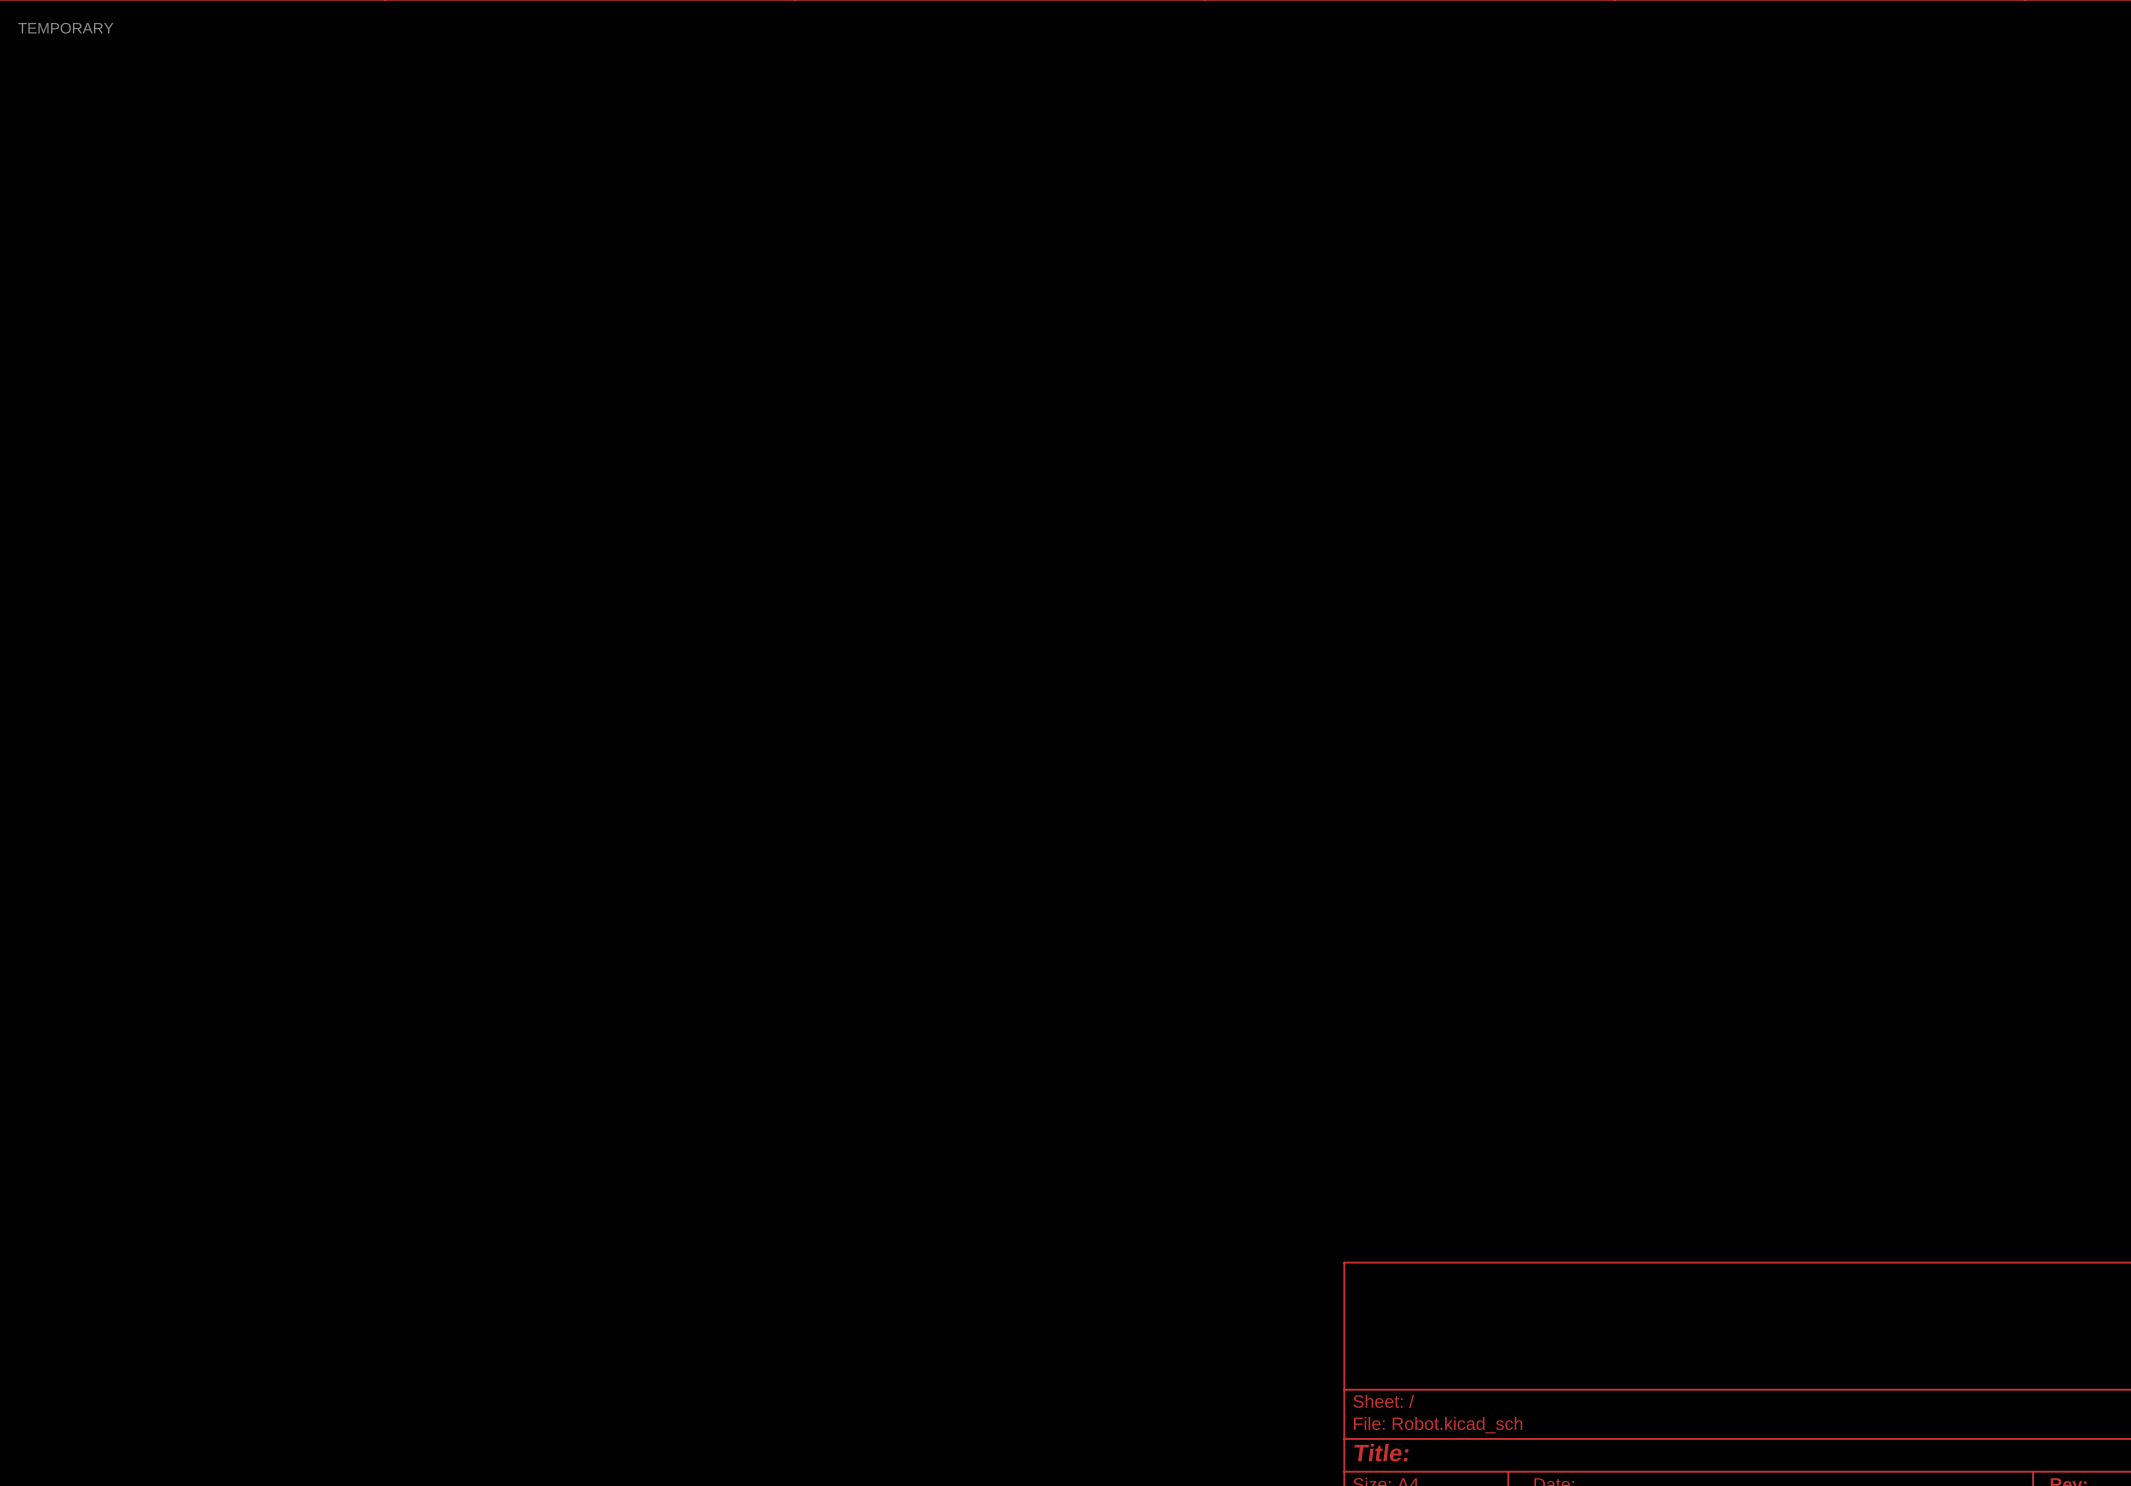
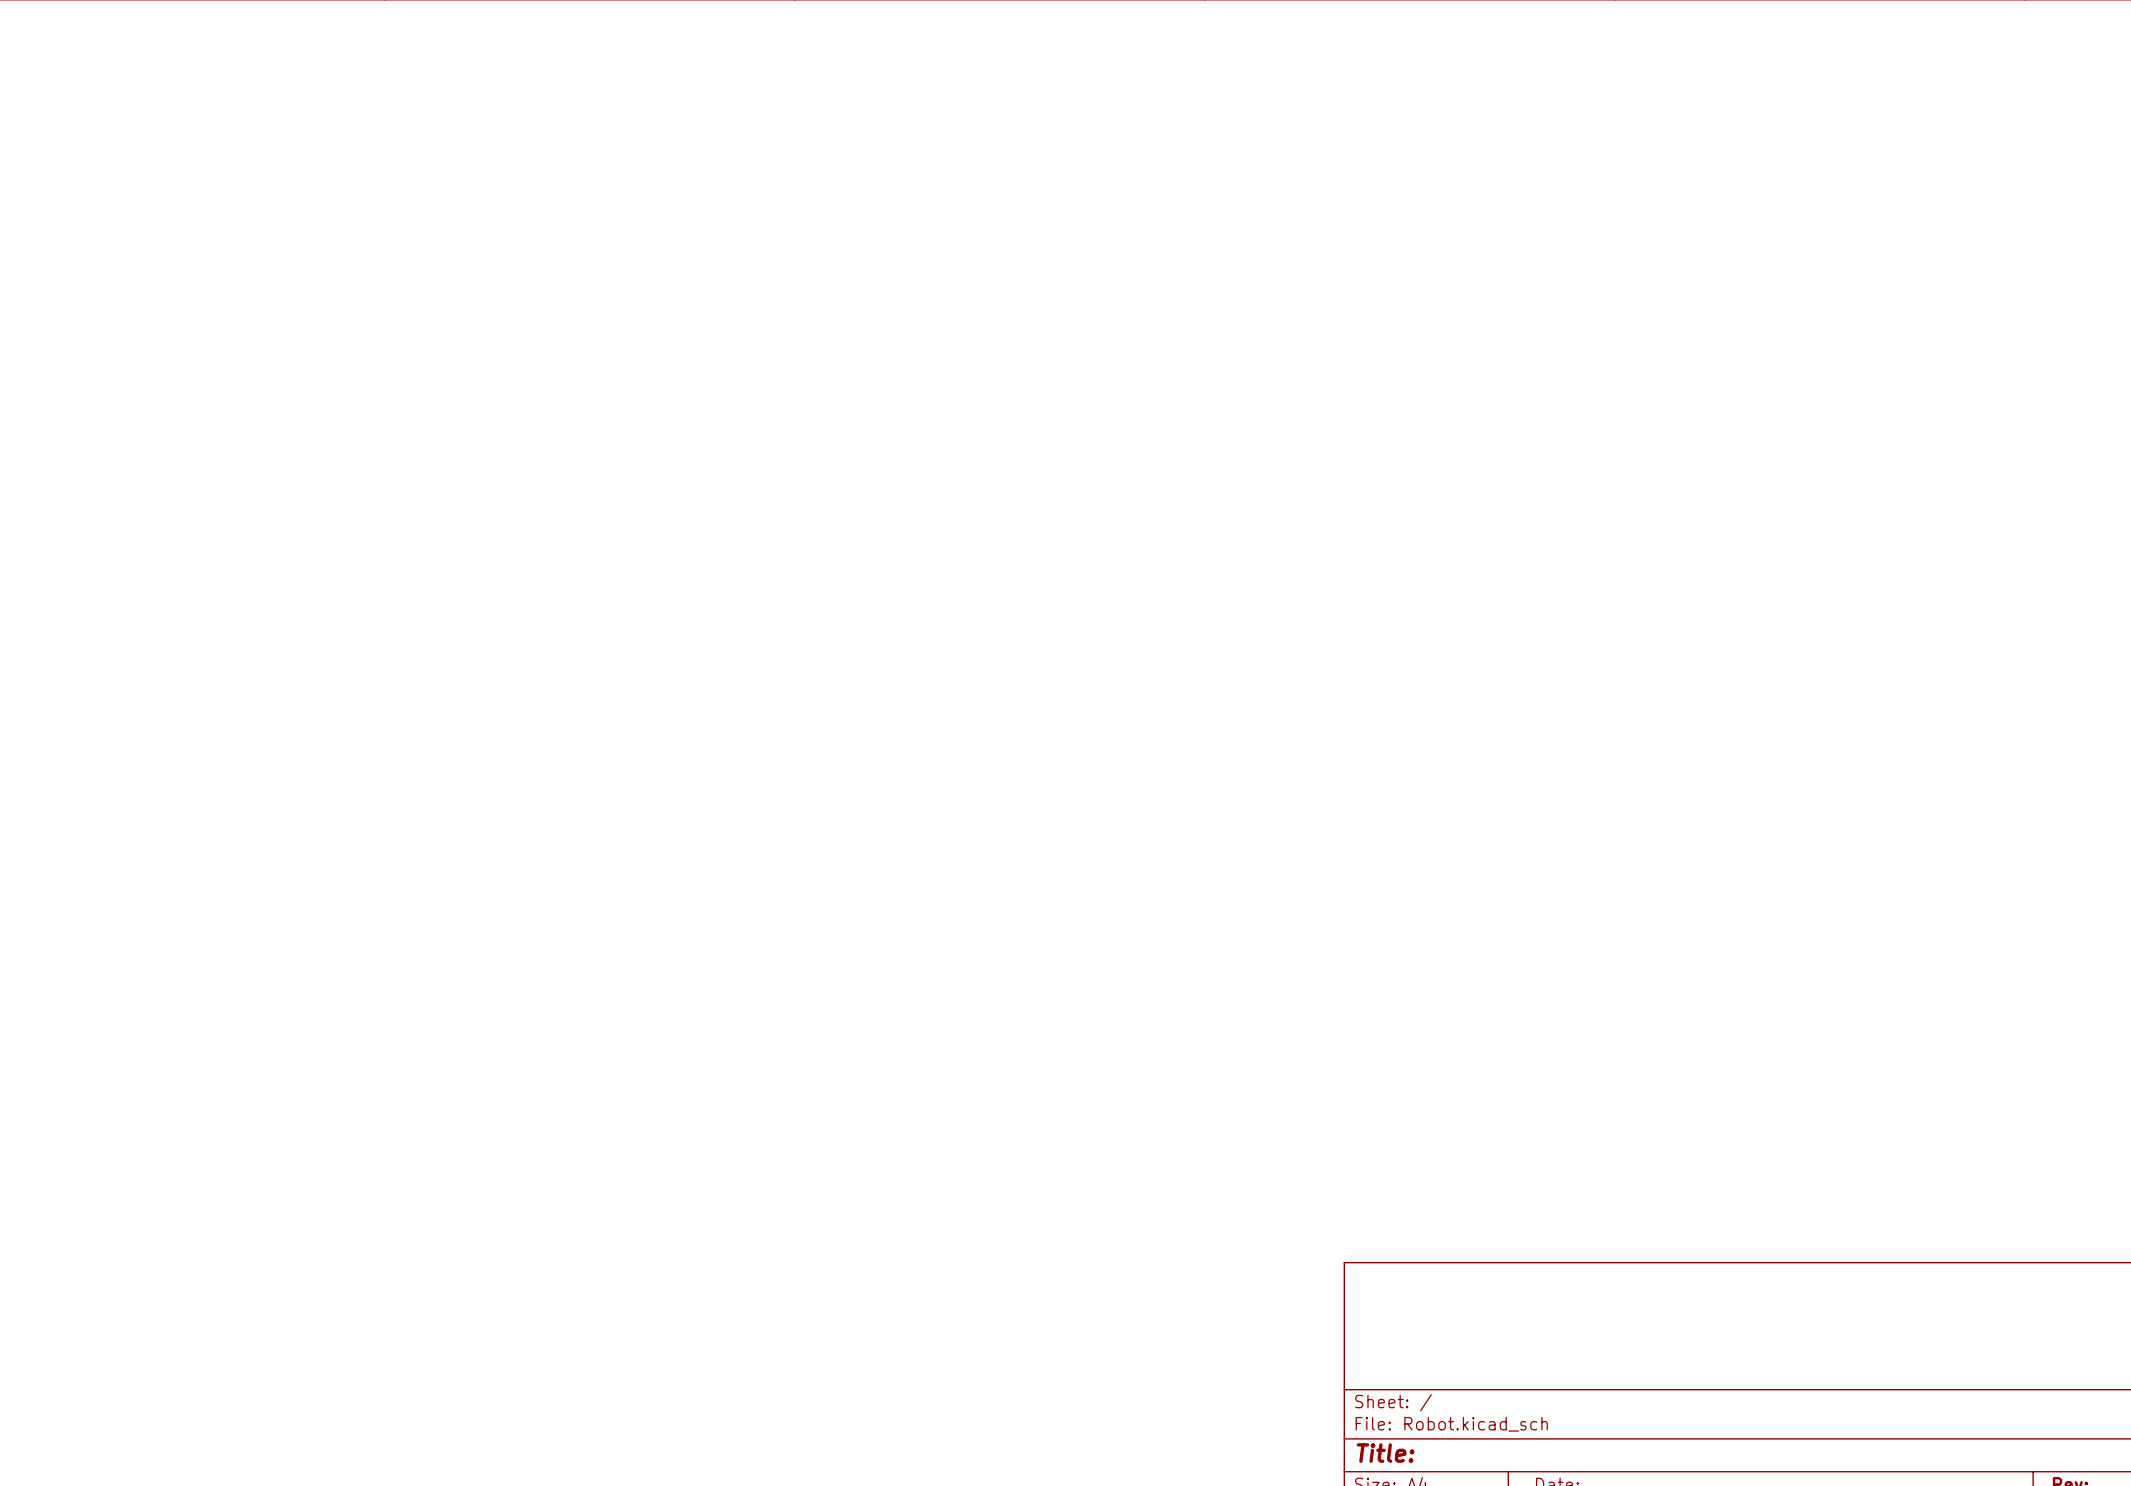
text: TEMPORARY (65, 28) -> none

